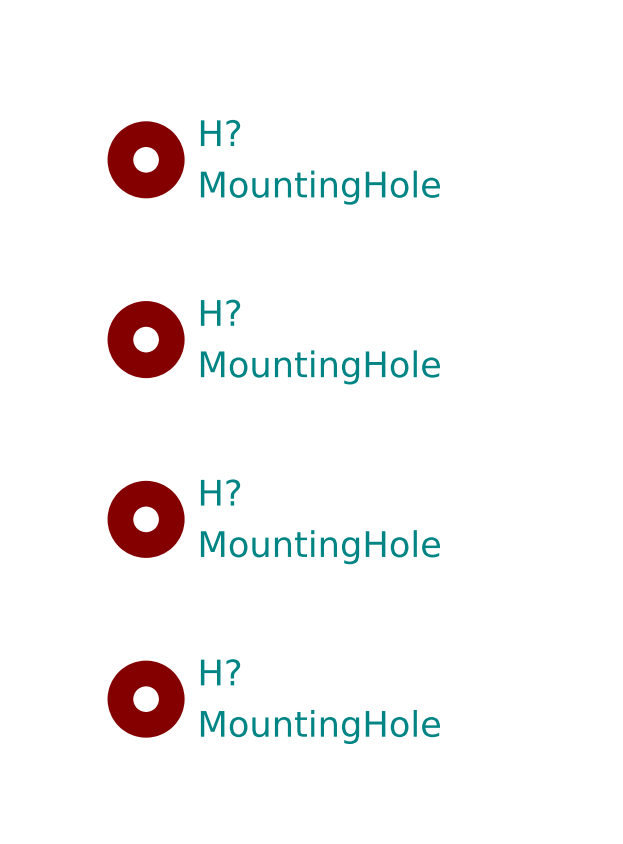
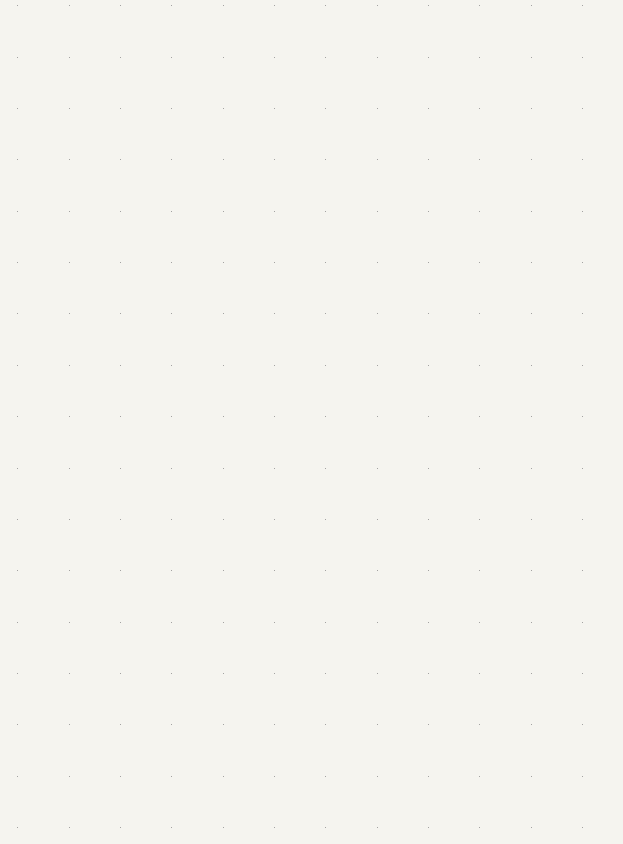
H?: MountingHole (146, 159) -> none
H?: MountingHole (146, 339) -> none
H?: MountingHole (146, 519) -> none
H?: MountingHole (146, 699) -> none

